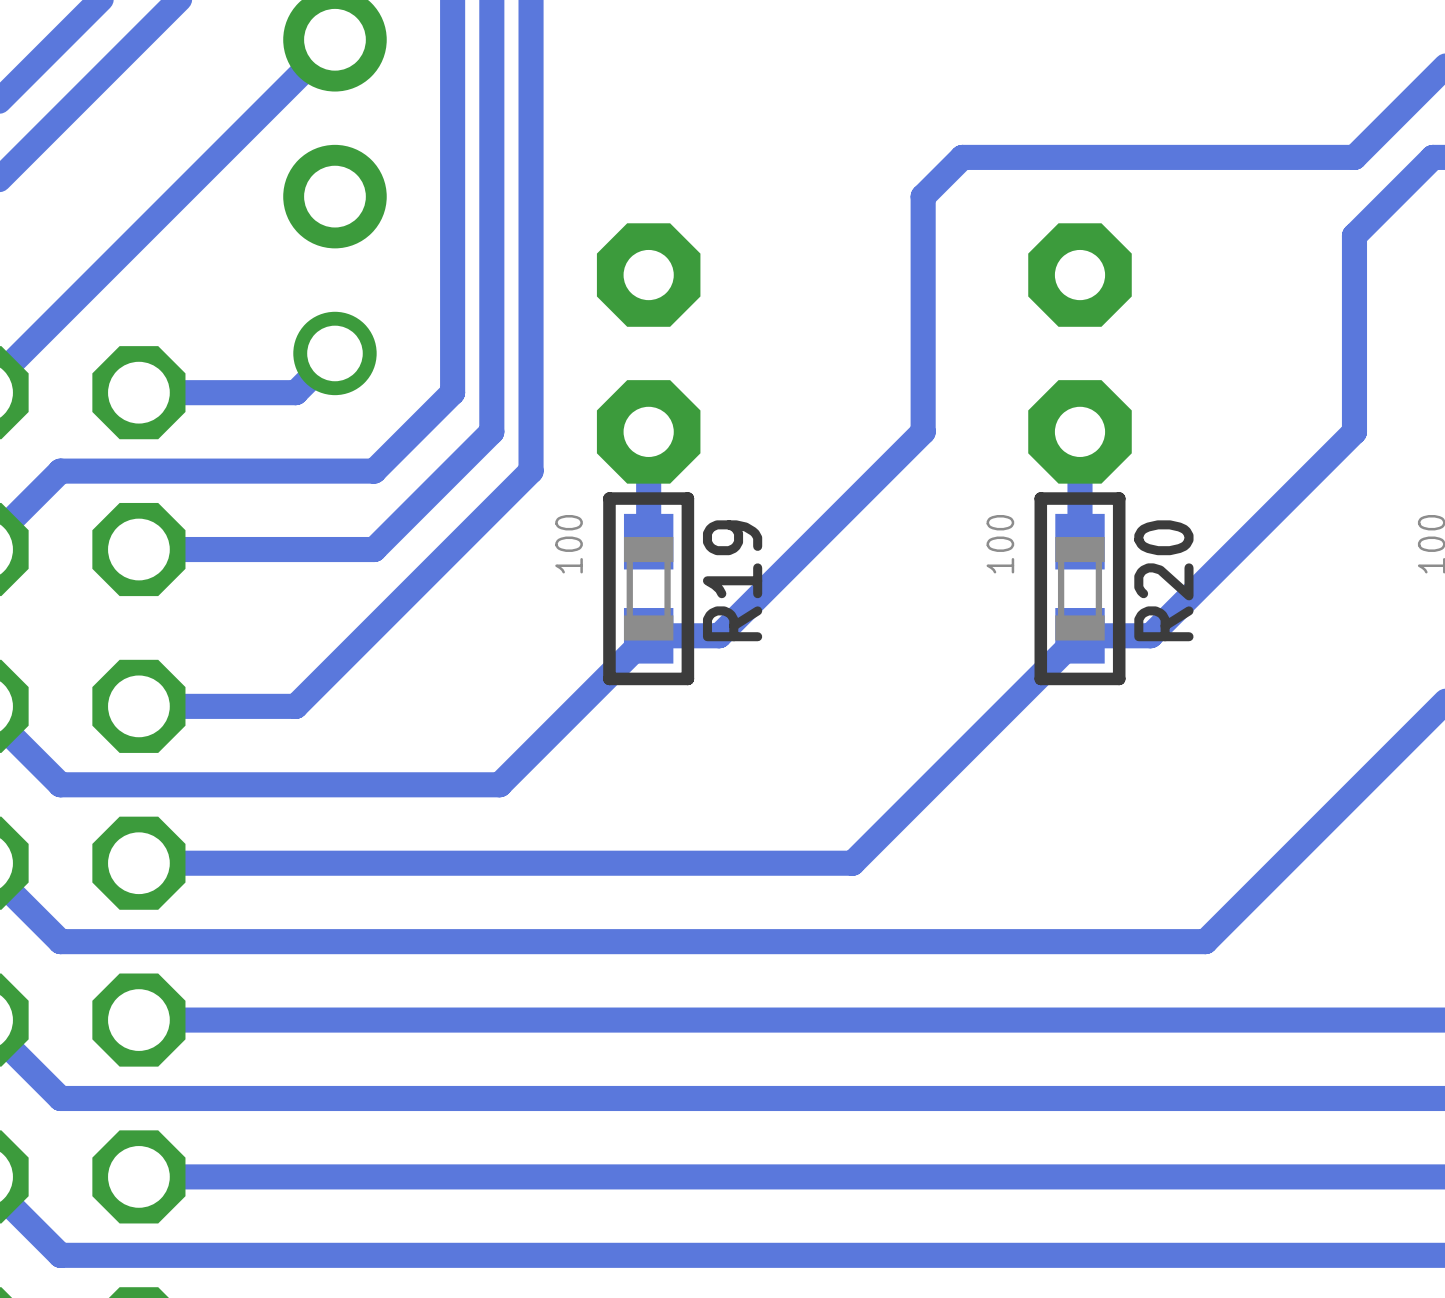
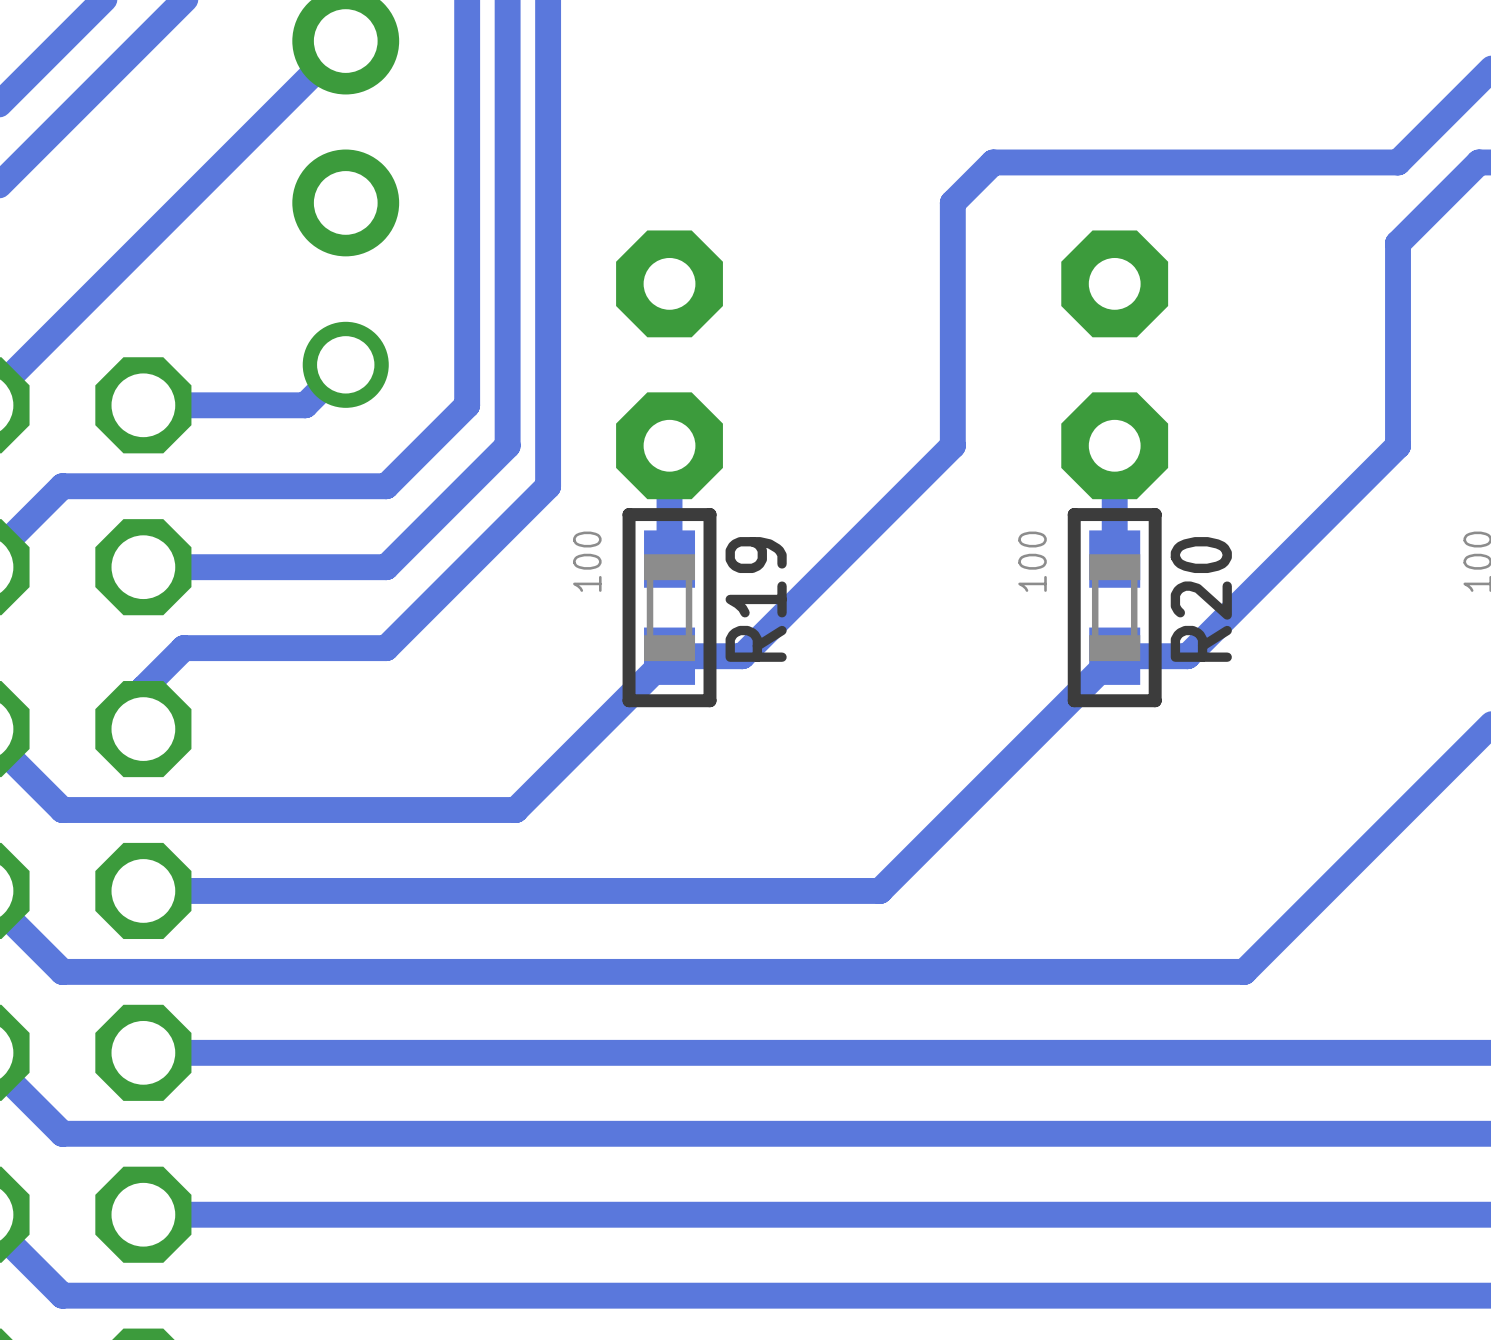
track: (374, 627) (295, 706) (138, 706) -> (386, 648) (183, 648) (143, 688) (143, 729)

